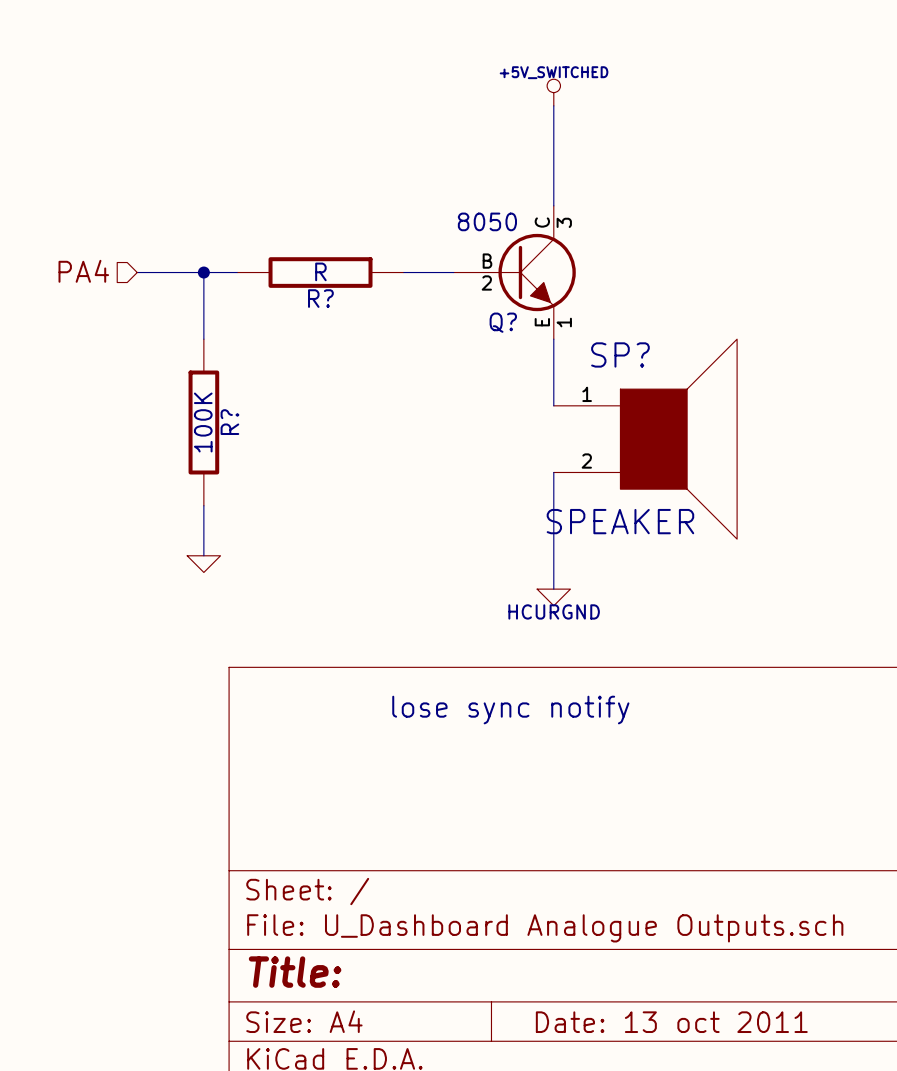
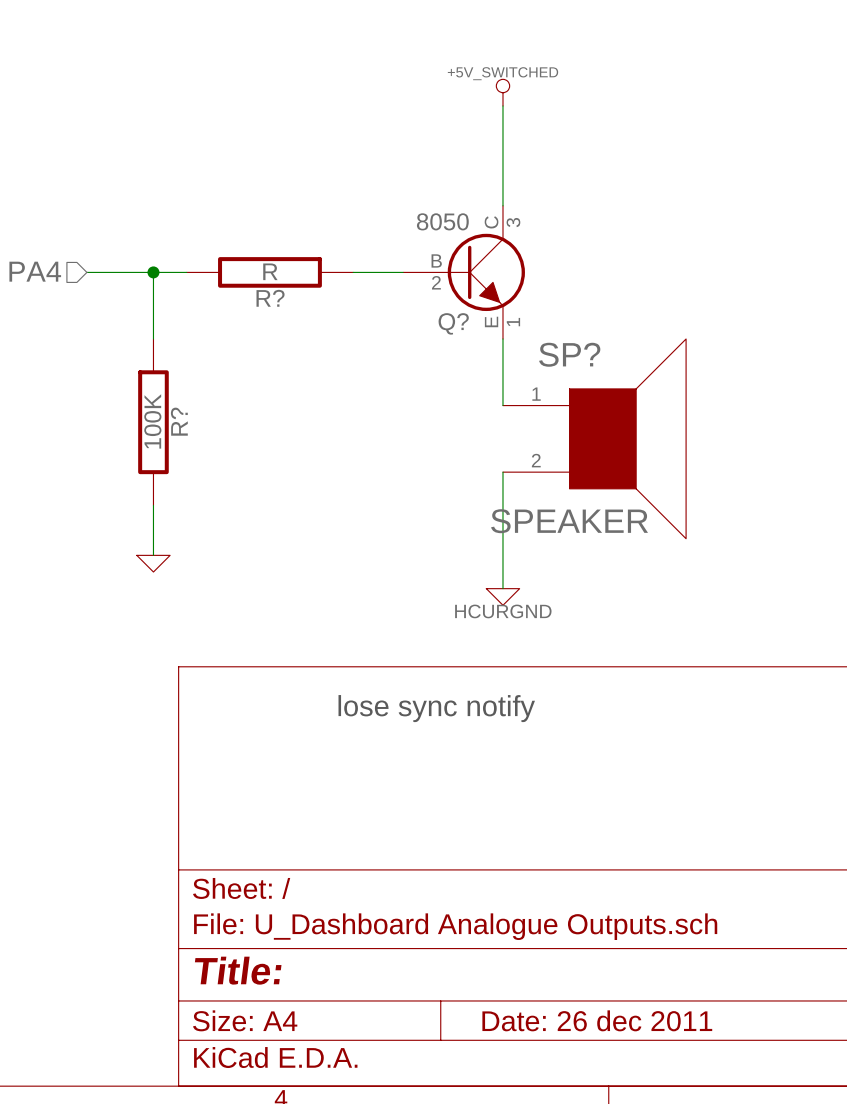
title block: Date: 13 oct 2011 (671, 1022) -> Date: 26 dec 2011 (597, 1020)

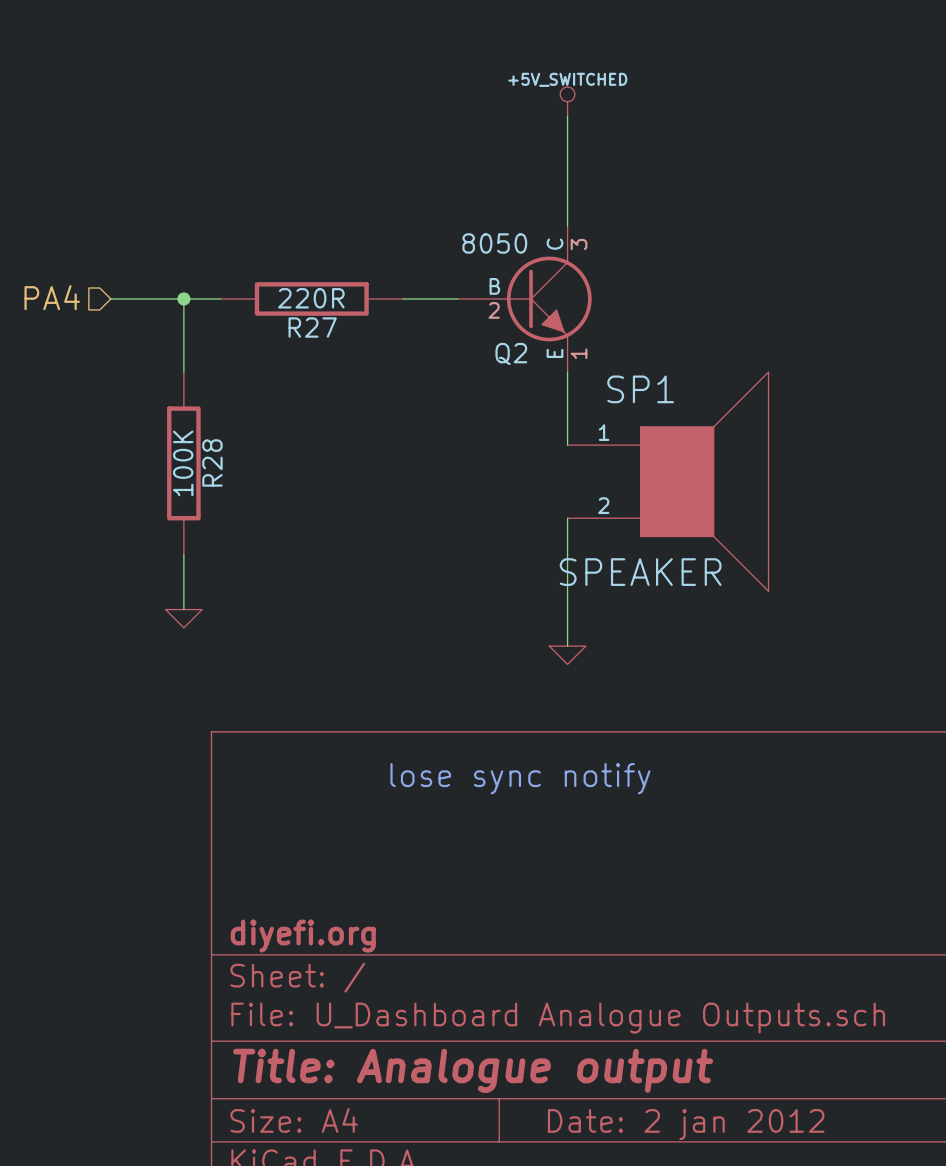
R? value: R (270, 271) -> 220R (311, 298)
R? name: R? (270, 298) -> R27 (312, 327)
Q? name: Q? (453, 323) -> Q2 (511, 353)
SP? name: SP? (569, 354) -> SP1 (640, 389)
R? name: R? (179, 421) -> R28 (212, 462)
power symbol text: HCURGND (503, 611) -> none
title block: none -> diyefi.org (303, 936)
title block: Title: (238, 970) -> Title: Analogue output (473, 1070)
title block: Date: 26 dec 2011 (597, 1020) -> Date: 2 jan 2012 (686, 1124)

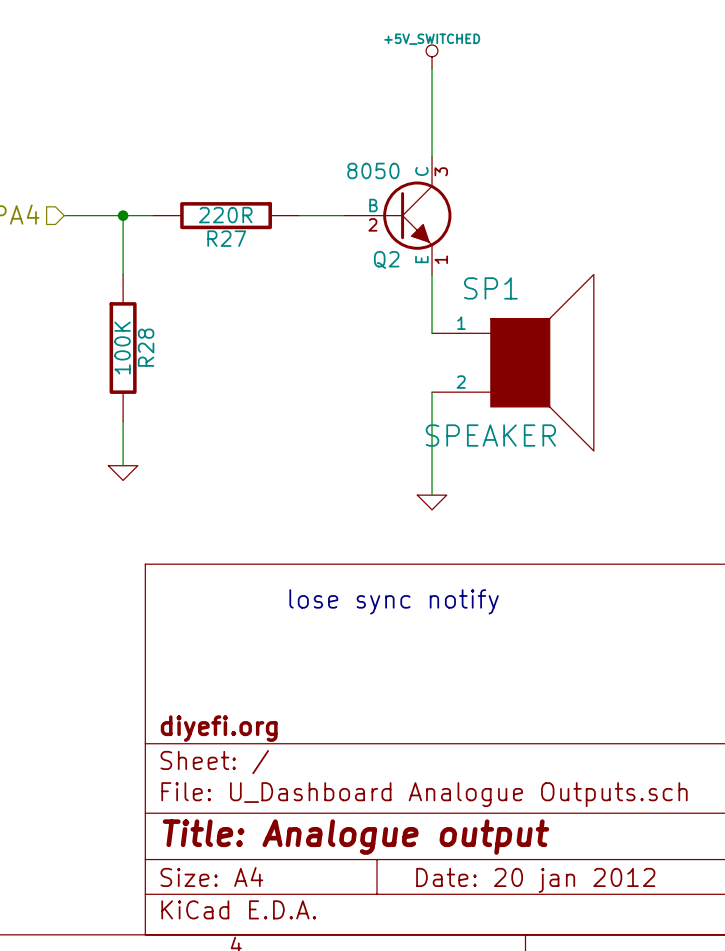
title block: Date: 2 jan 2012 (686, 1124) -> Date: 20 jan 2012 (535, 880)

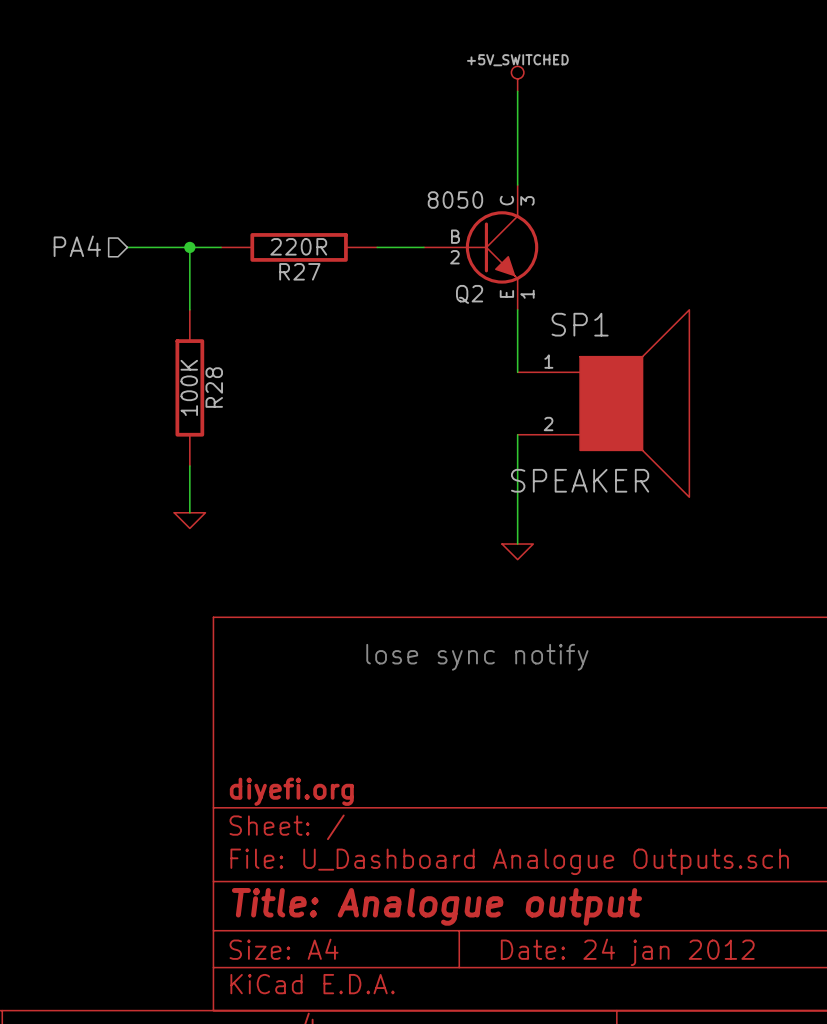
title block: Date: 20 jan 2012 (535, 880) -> Date: 24 jan 2012 (627, 952)

